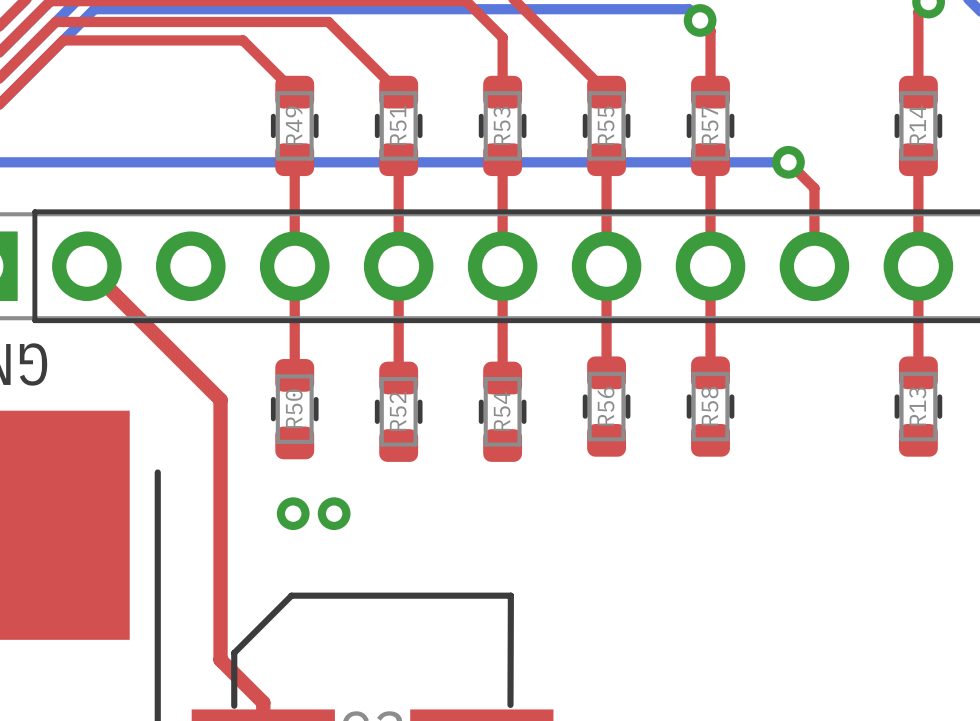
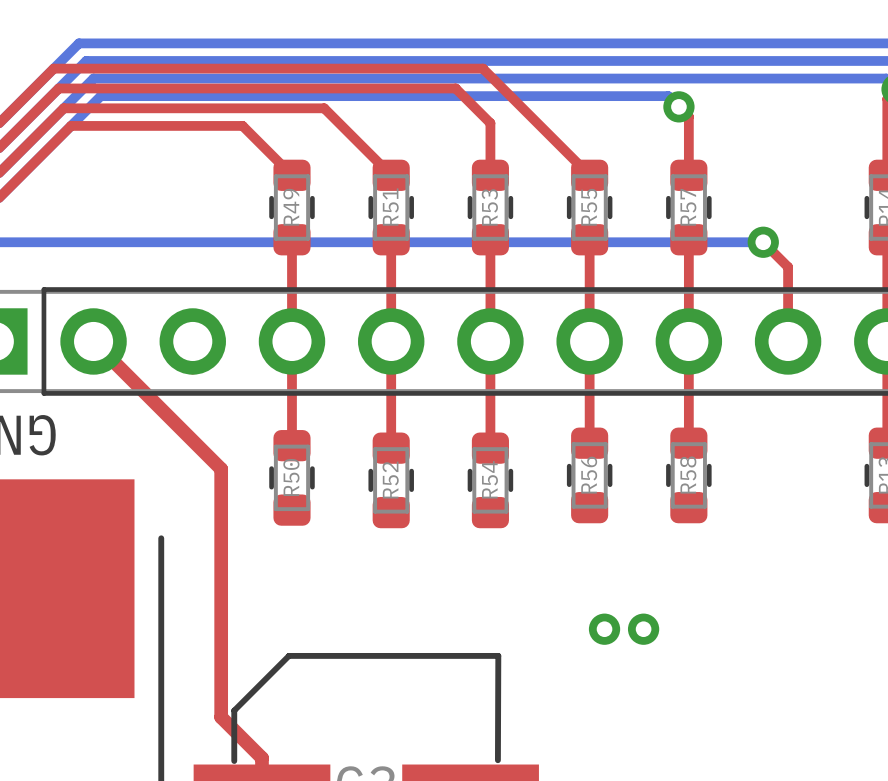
via: (293, 513) -> none
via: (334, 513) -> none
via: none -> (604, 629)
via: none -> (643, 629)

